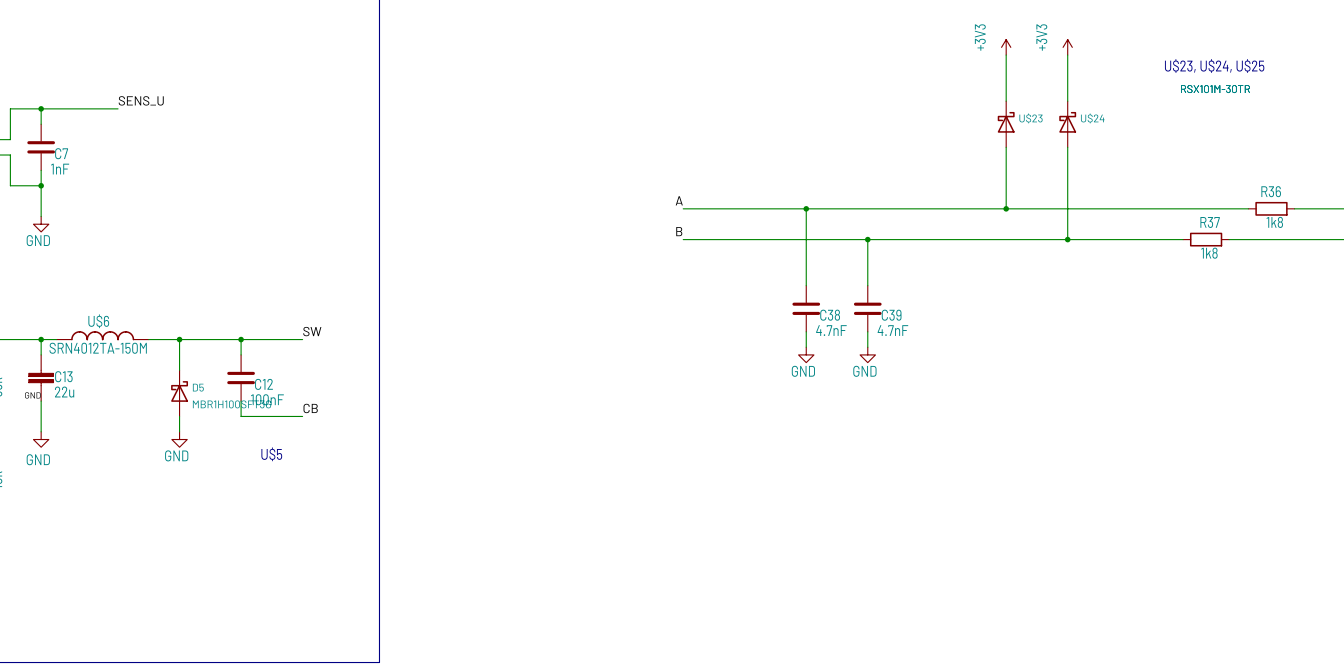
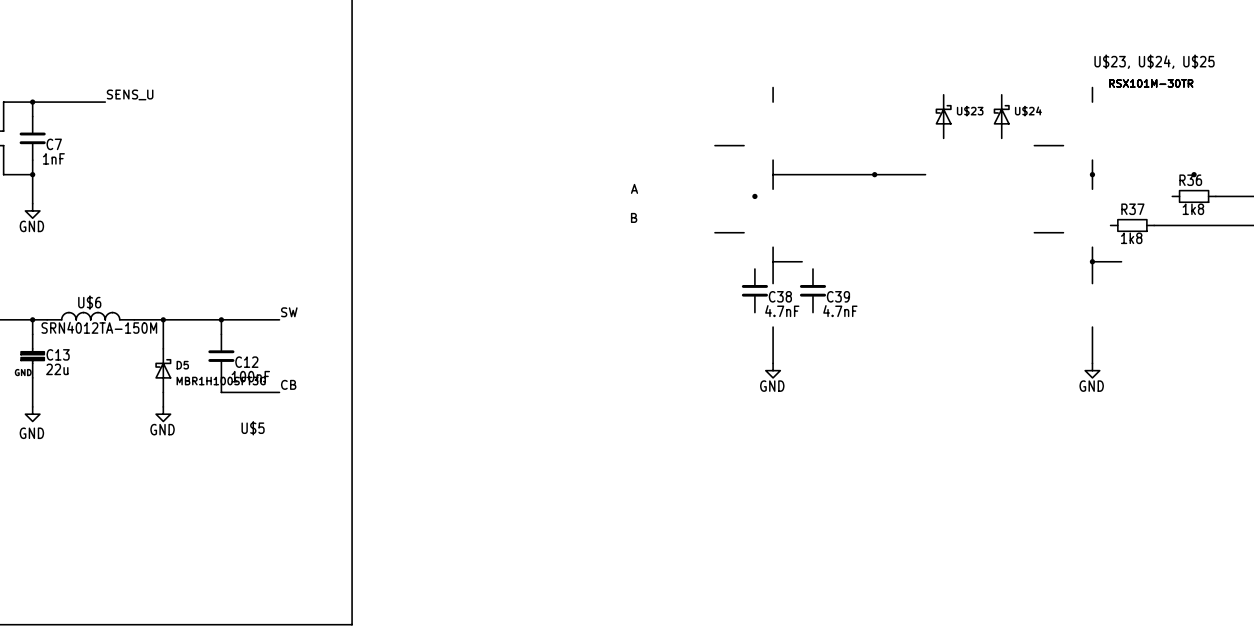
power symbol: +3V3 (1006, 47) -> none
power symbol: +3V3 (1067, 47) -> none
wire: (1006, 55) (1006, 101) -> none
wire: (1067, 55) (1067, 101) -> none
wire: none -> (773, 87) (773, 102)
wire: none -> (1092, 87) (1092, 102)
wire: (1006, 147) (1006, 208) -> none
wire: (1067, 147) (1067, 239) -> none
wire: none -> (715, 145) (744, 145)
wire: none -> (1034, 145) (1063, 145)
wire: none -> (773, 160) (773, 189)
wire: none -> (1092, 160) (1092, 189)
wire: none -> (773, 174) (925, 174)
junction: none -> (874, 174)
junction: none -> (1092, 174)
junction: none -> (1194, 174)
wire: (683, 208) (1248, 208) -> none
wire: (806, 208) (806, 285) -> none
junction: (1006, 208) -> none
wire: (683, 239) (1183, 239) -> none
wire: (867, 239) (867, 285) -> none
junction: (867, 239) -> none
junction: (1067, 239) -> none
wire: none -> (715, 232) (744, 232)
wire: none -> (1034, 232) (1063, 232)
wire: none -> (773, 247) (773, 283)
wire: none -> (1092, 247) (1092, 283)
wire: none -> (773, 261) (802, 261)
wire: none -> (1092, 261) (1121, 261)
junction: none -> (1092, 261)
wire: (806, 331) (806, 347) -> none
wire: (867, 331) (867, 347) -> none
wire: none -> (773, 327) (773, 363)
wire: none -> (1092, 327) (1092, 363)
power symbol: GND (806, 354) -> none
power symbol: GND (867, 354) -> none
power symbol: none -> GND (773, 370)
power symbol: none -> GND (1092, 370)

